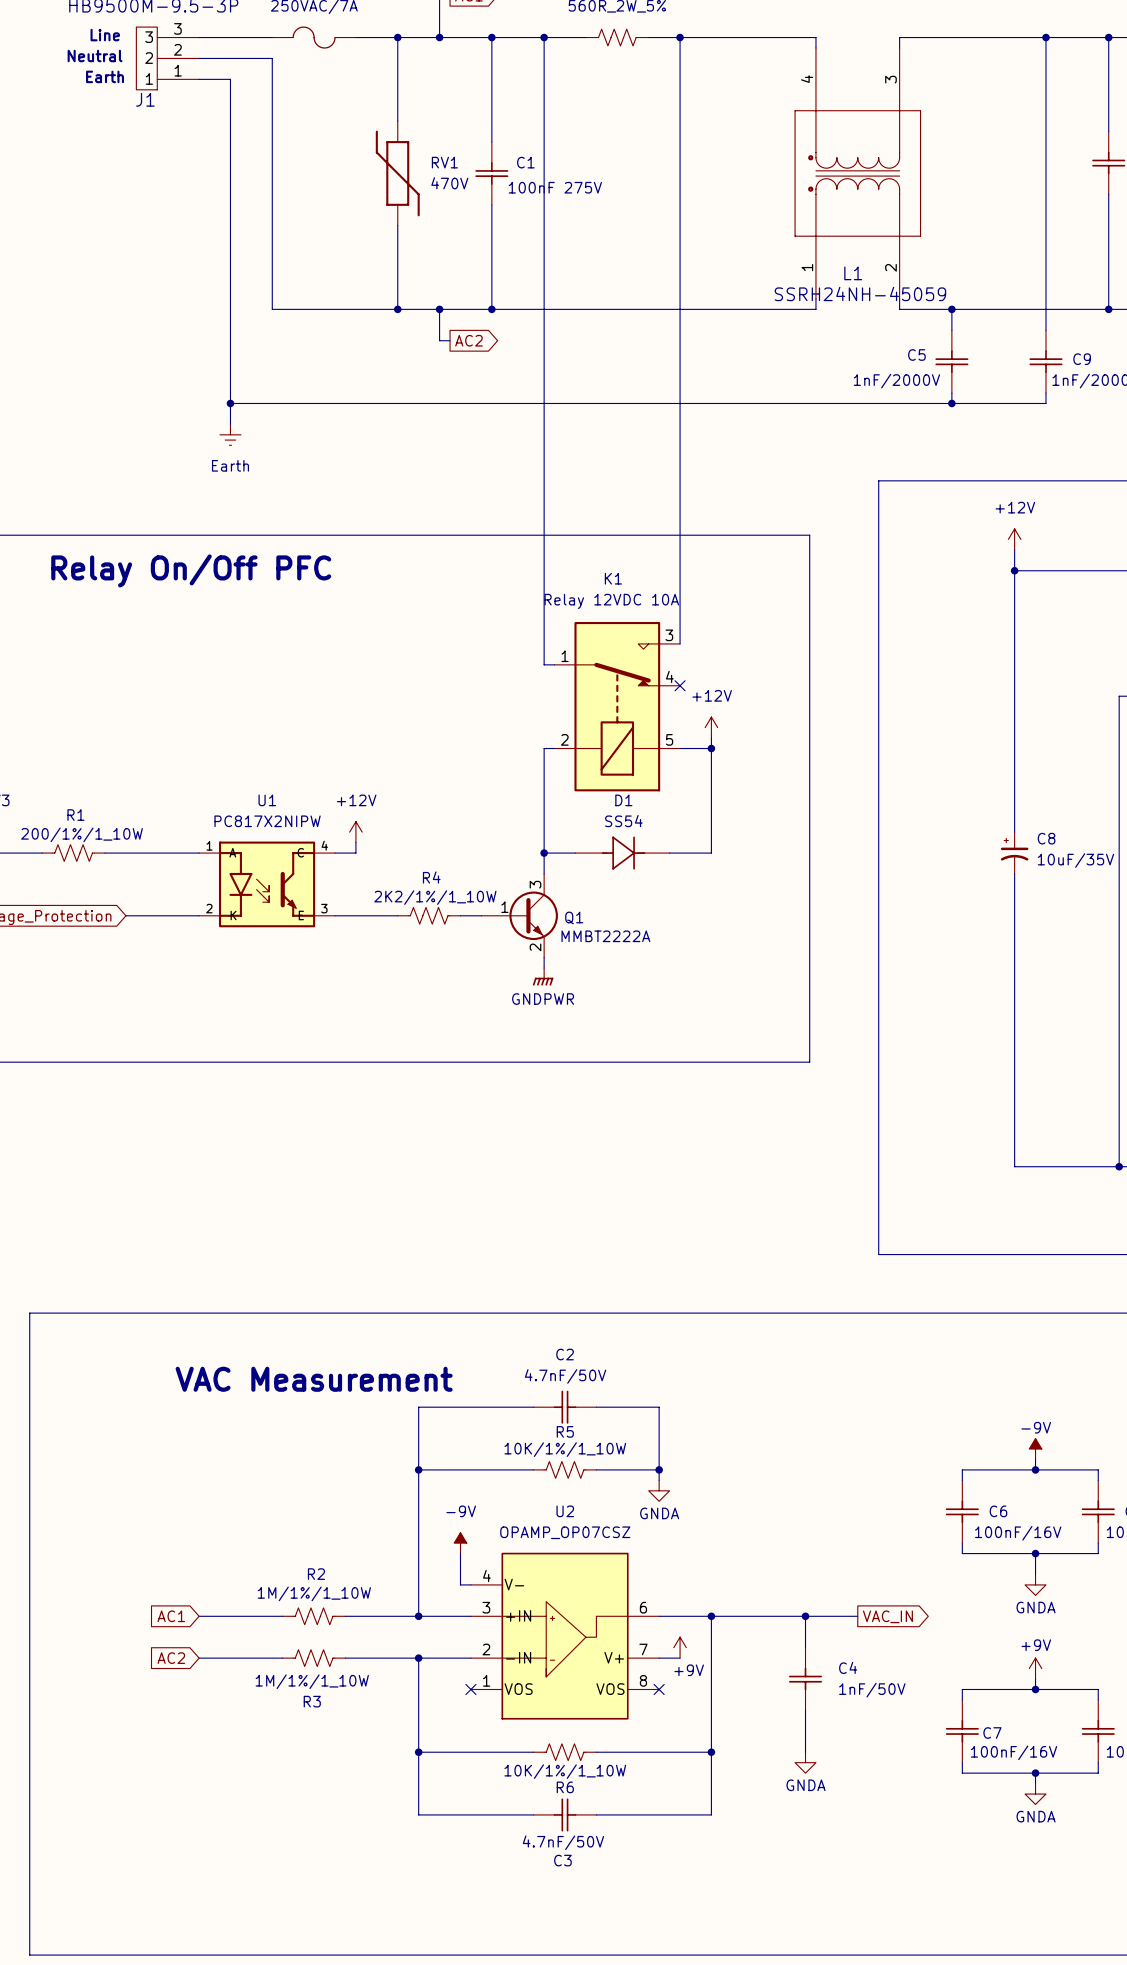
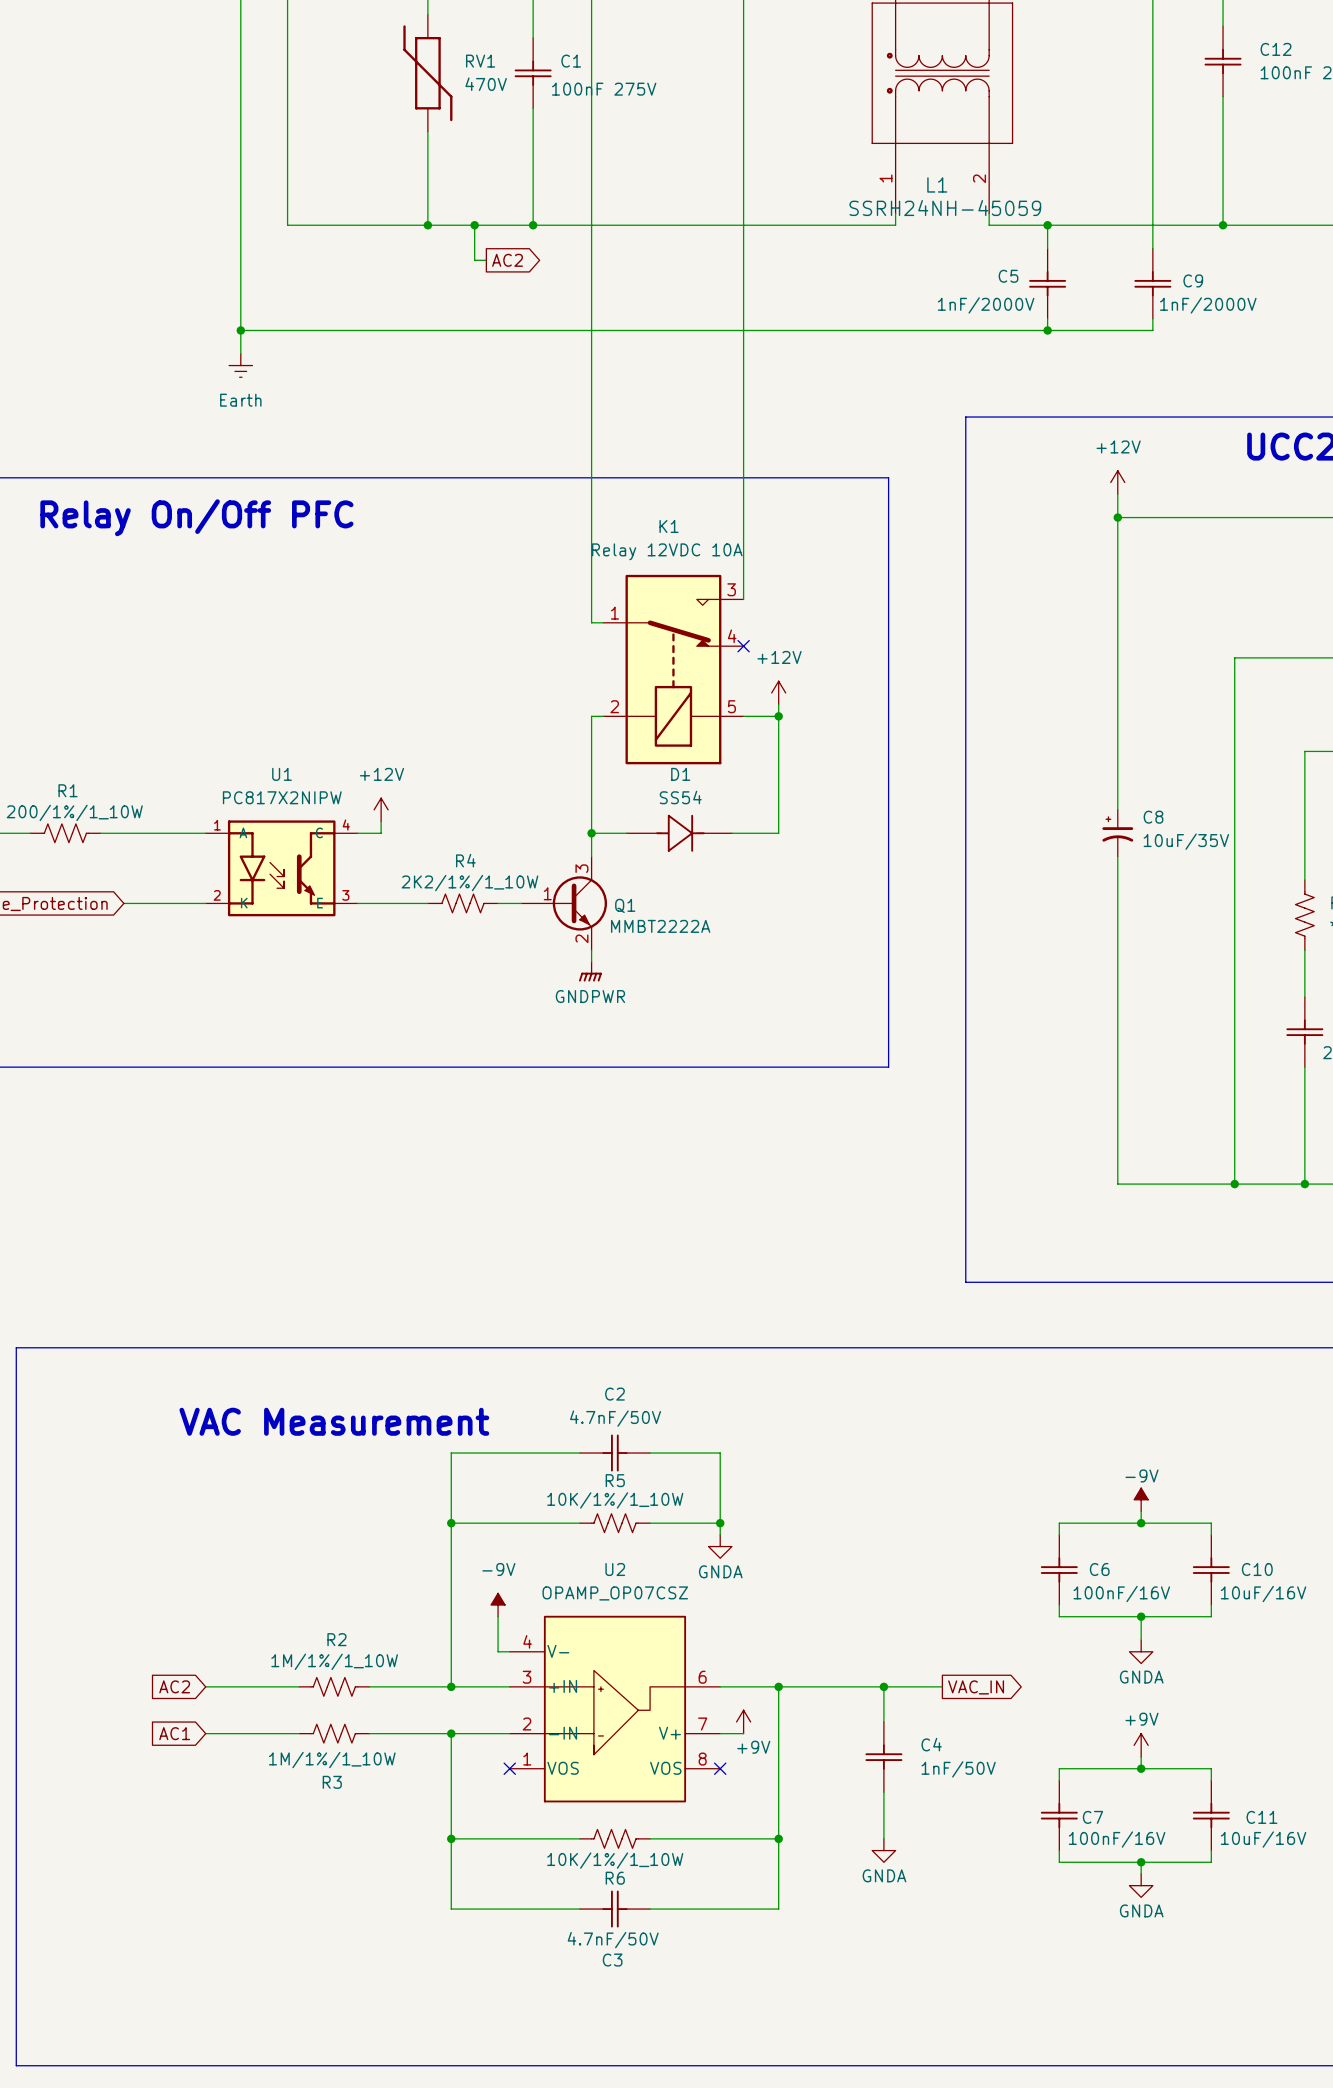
global label: AC1 (171, 1616) -> AC2 (174, 1686)
global label: AC2 (171, 1658) -> AC1 (174, 1733)

